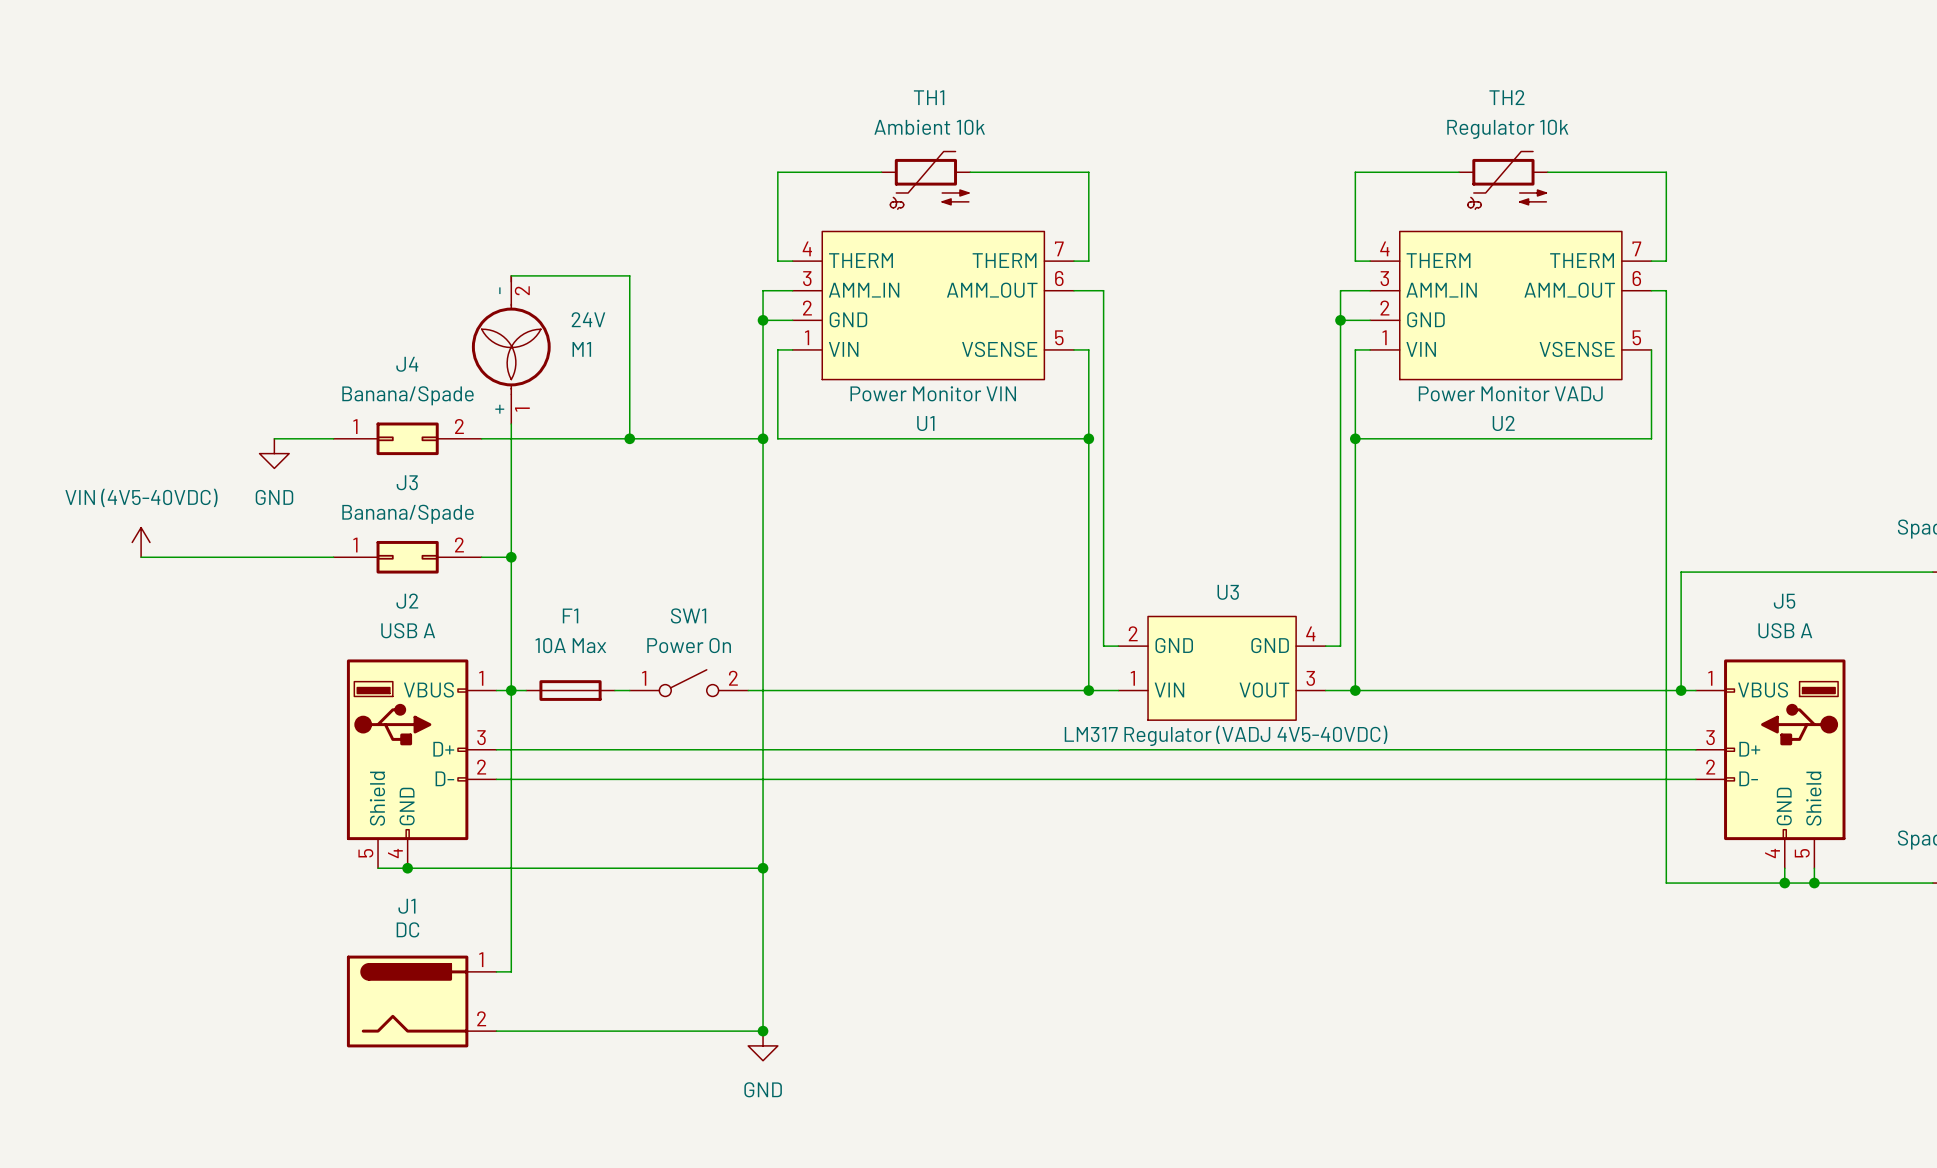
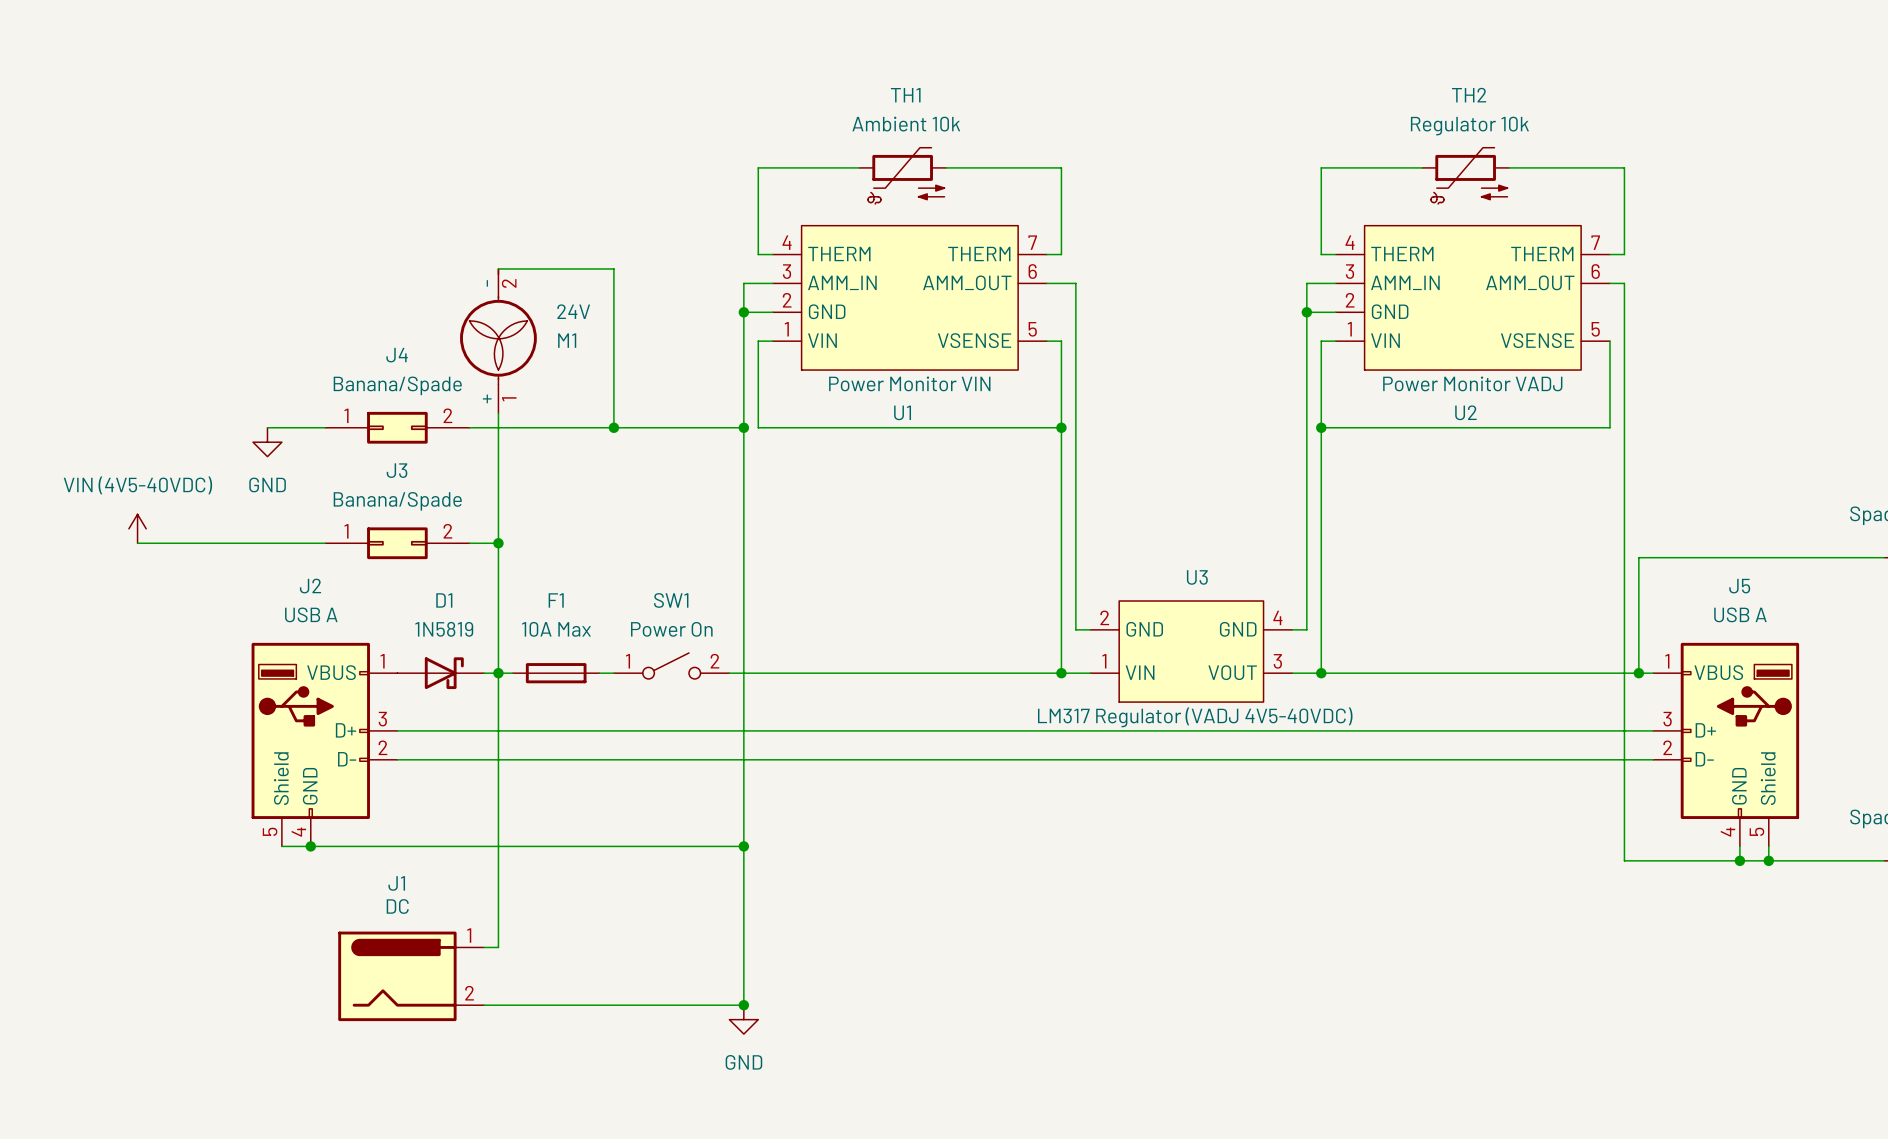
D1: none -> 1N5819 (440, 673)
J2 position: (421, 763) -> (324, 744)
wire: none -> (281, 846) (368, 846)
junction: none -> (310, 846)
junction: (407, 868) -> none

